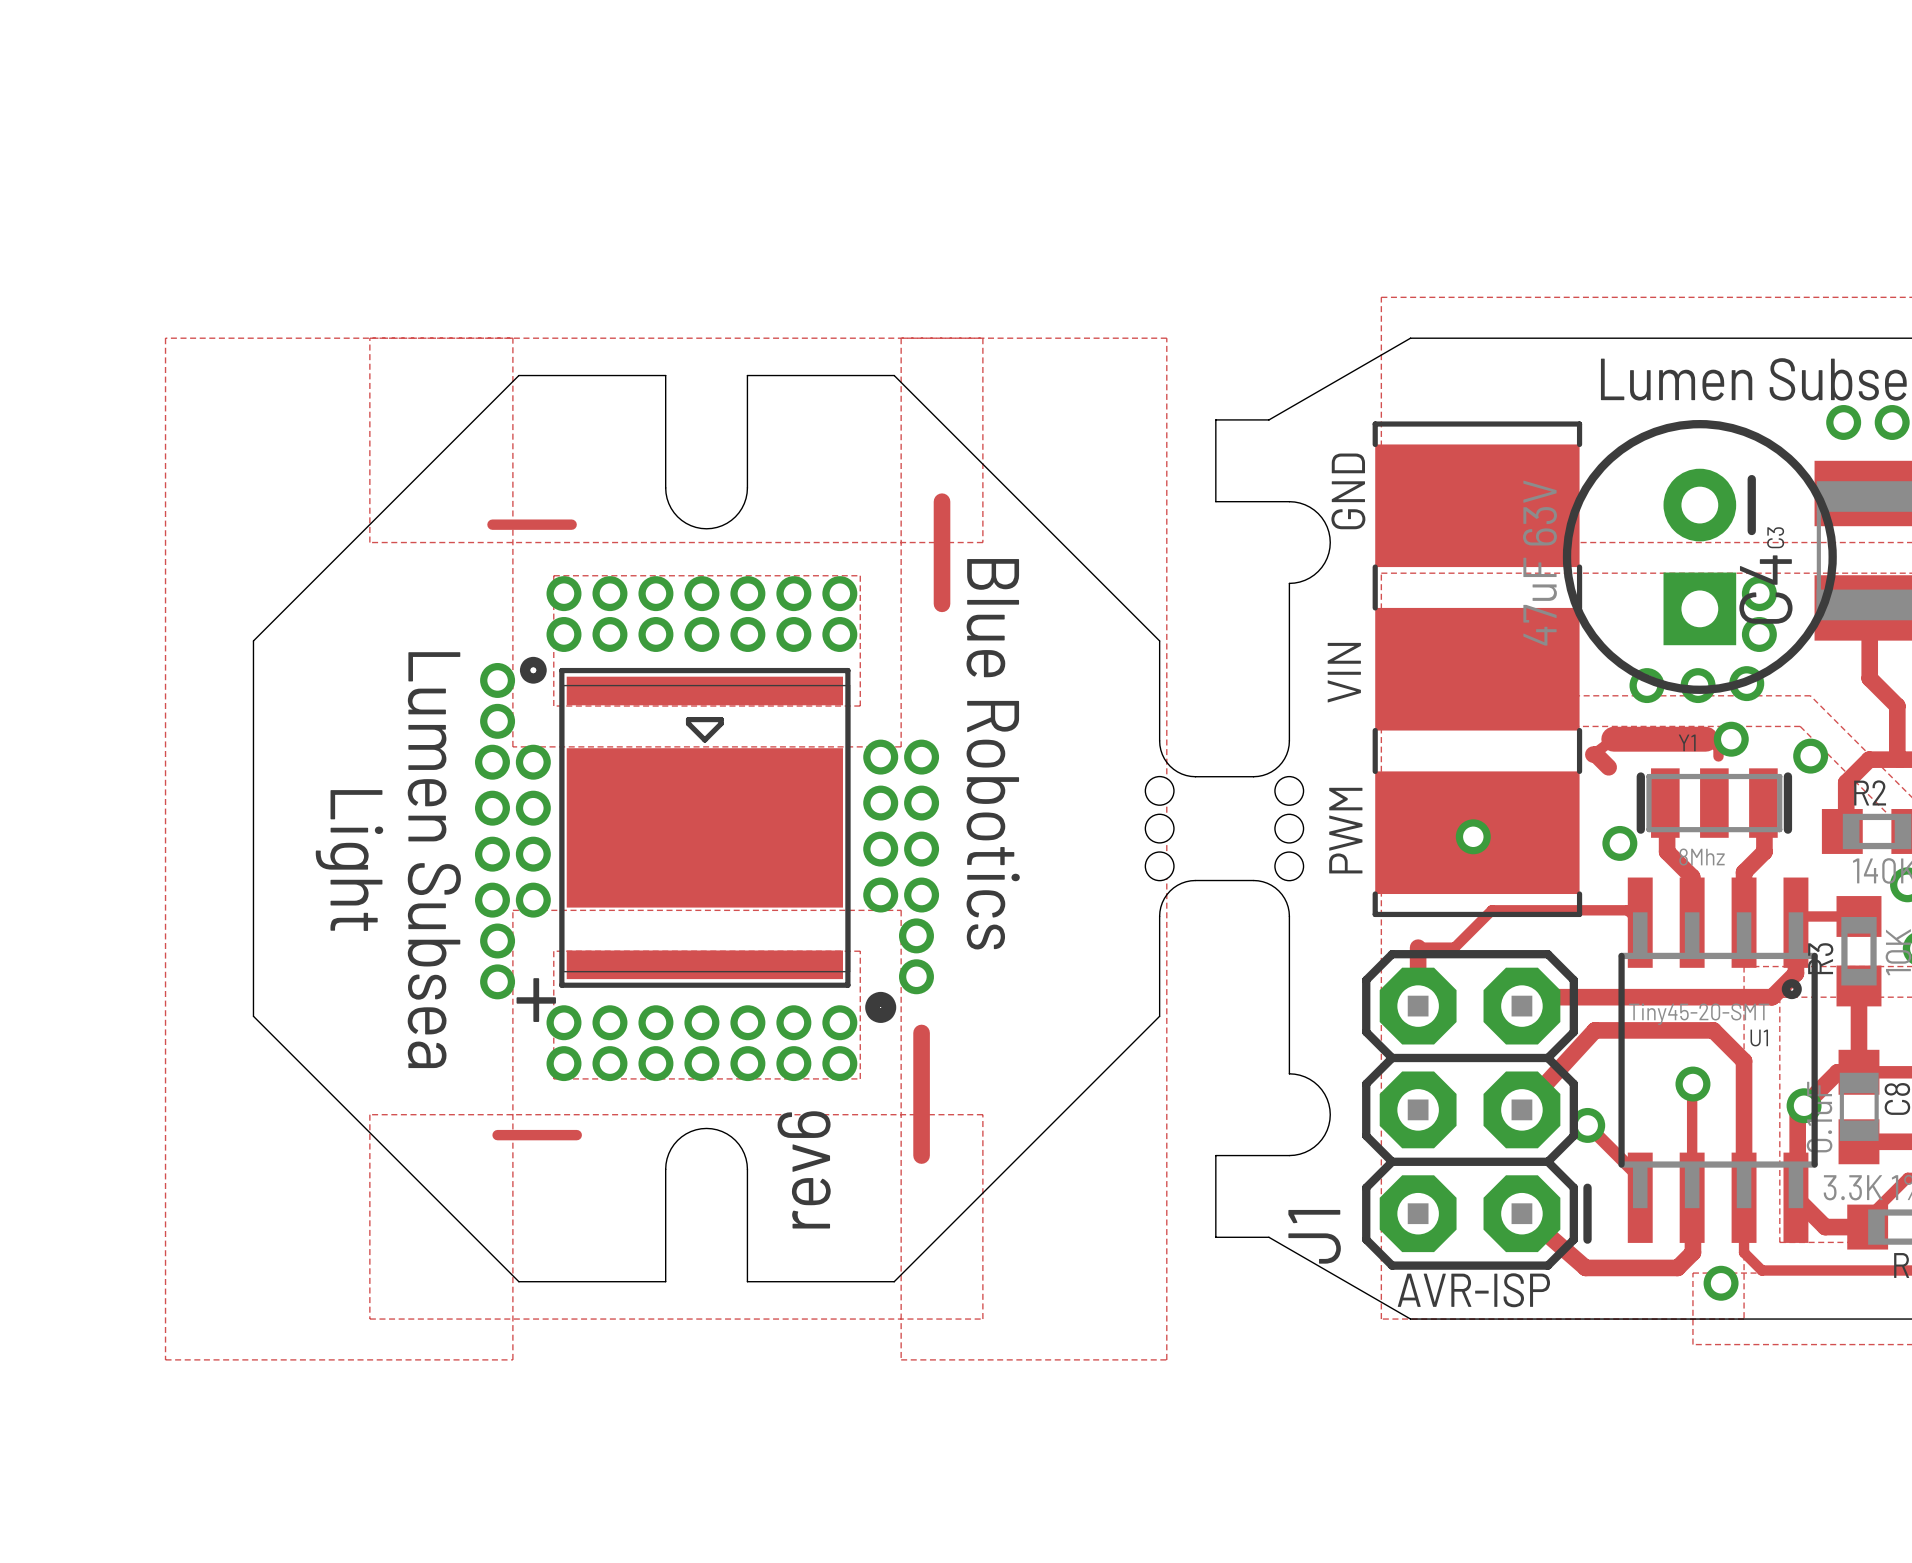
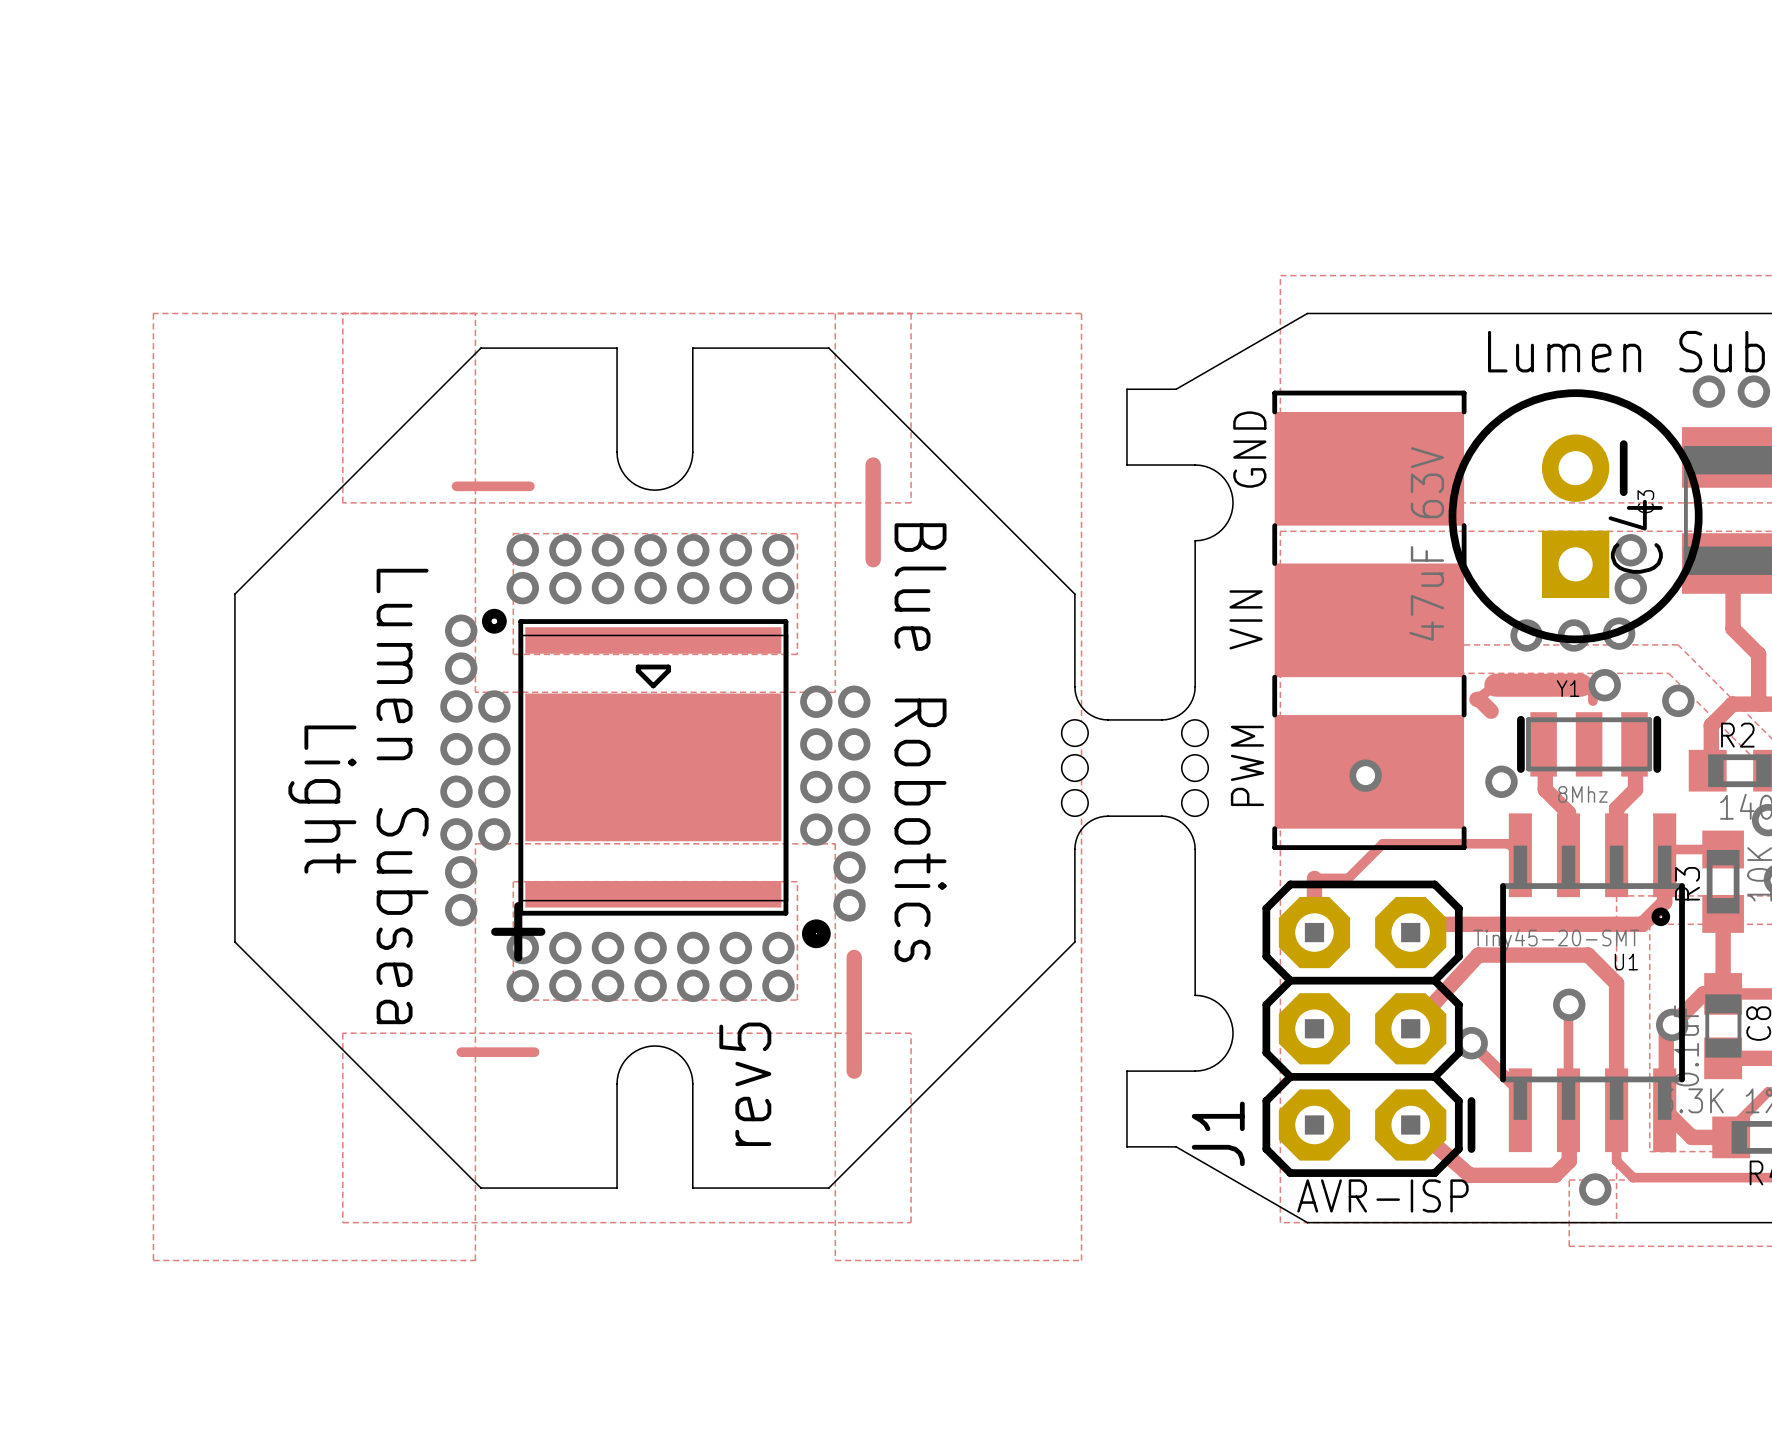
text: rev6 (804, 1169) -> rev5 (745, 1084)

